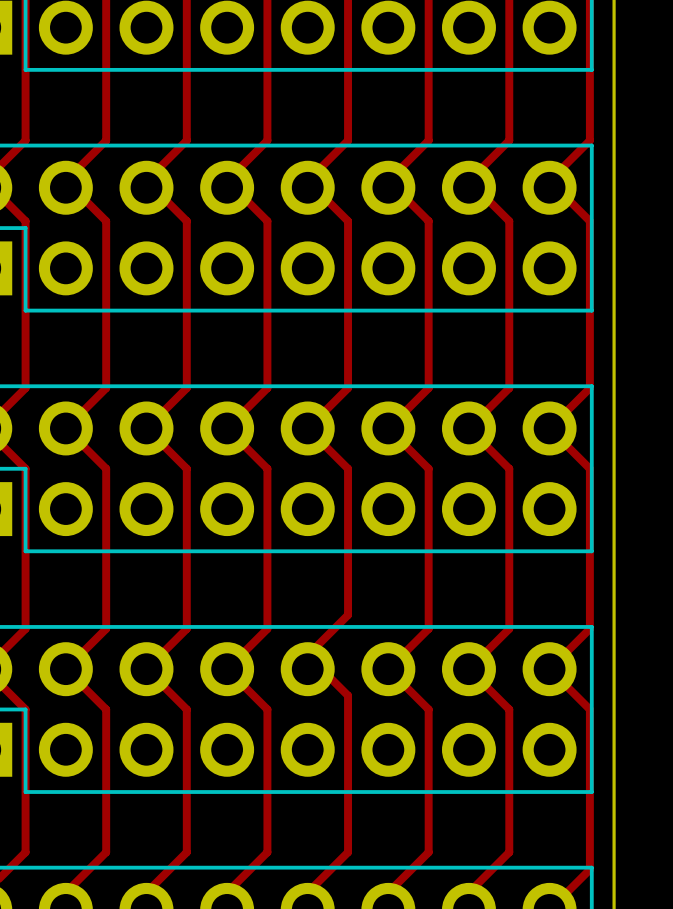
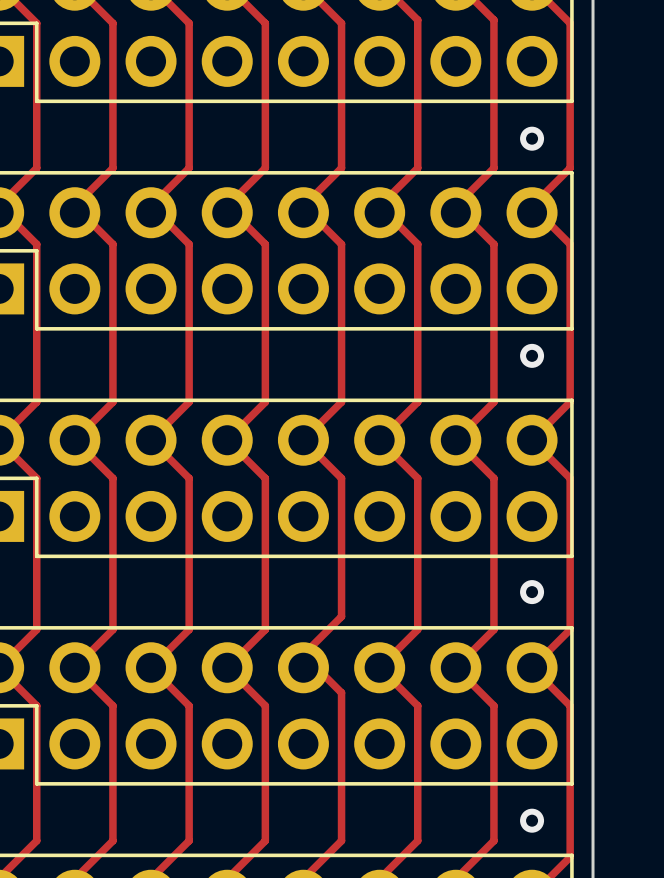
via: none -> (532, 138)
via: none -> (532, 355)
via: none -> (532, 592)
via: none -> (532, 820)

